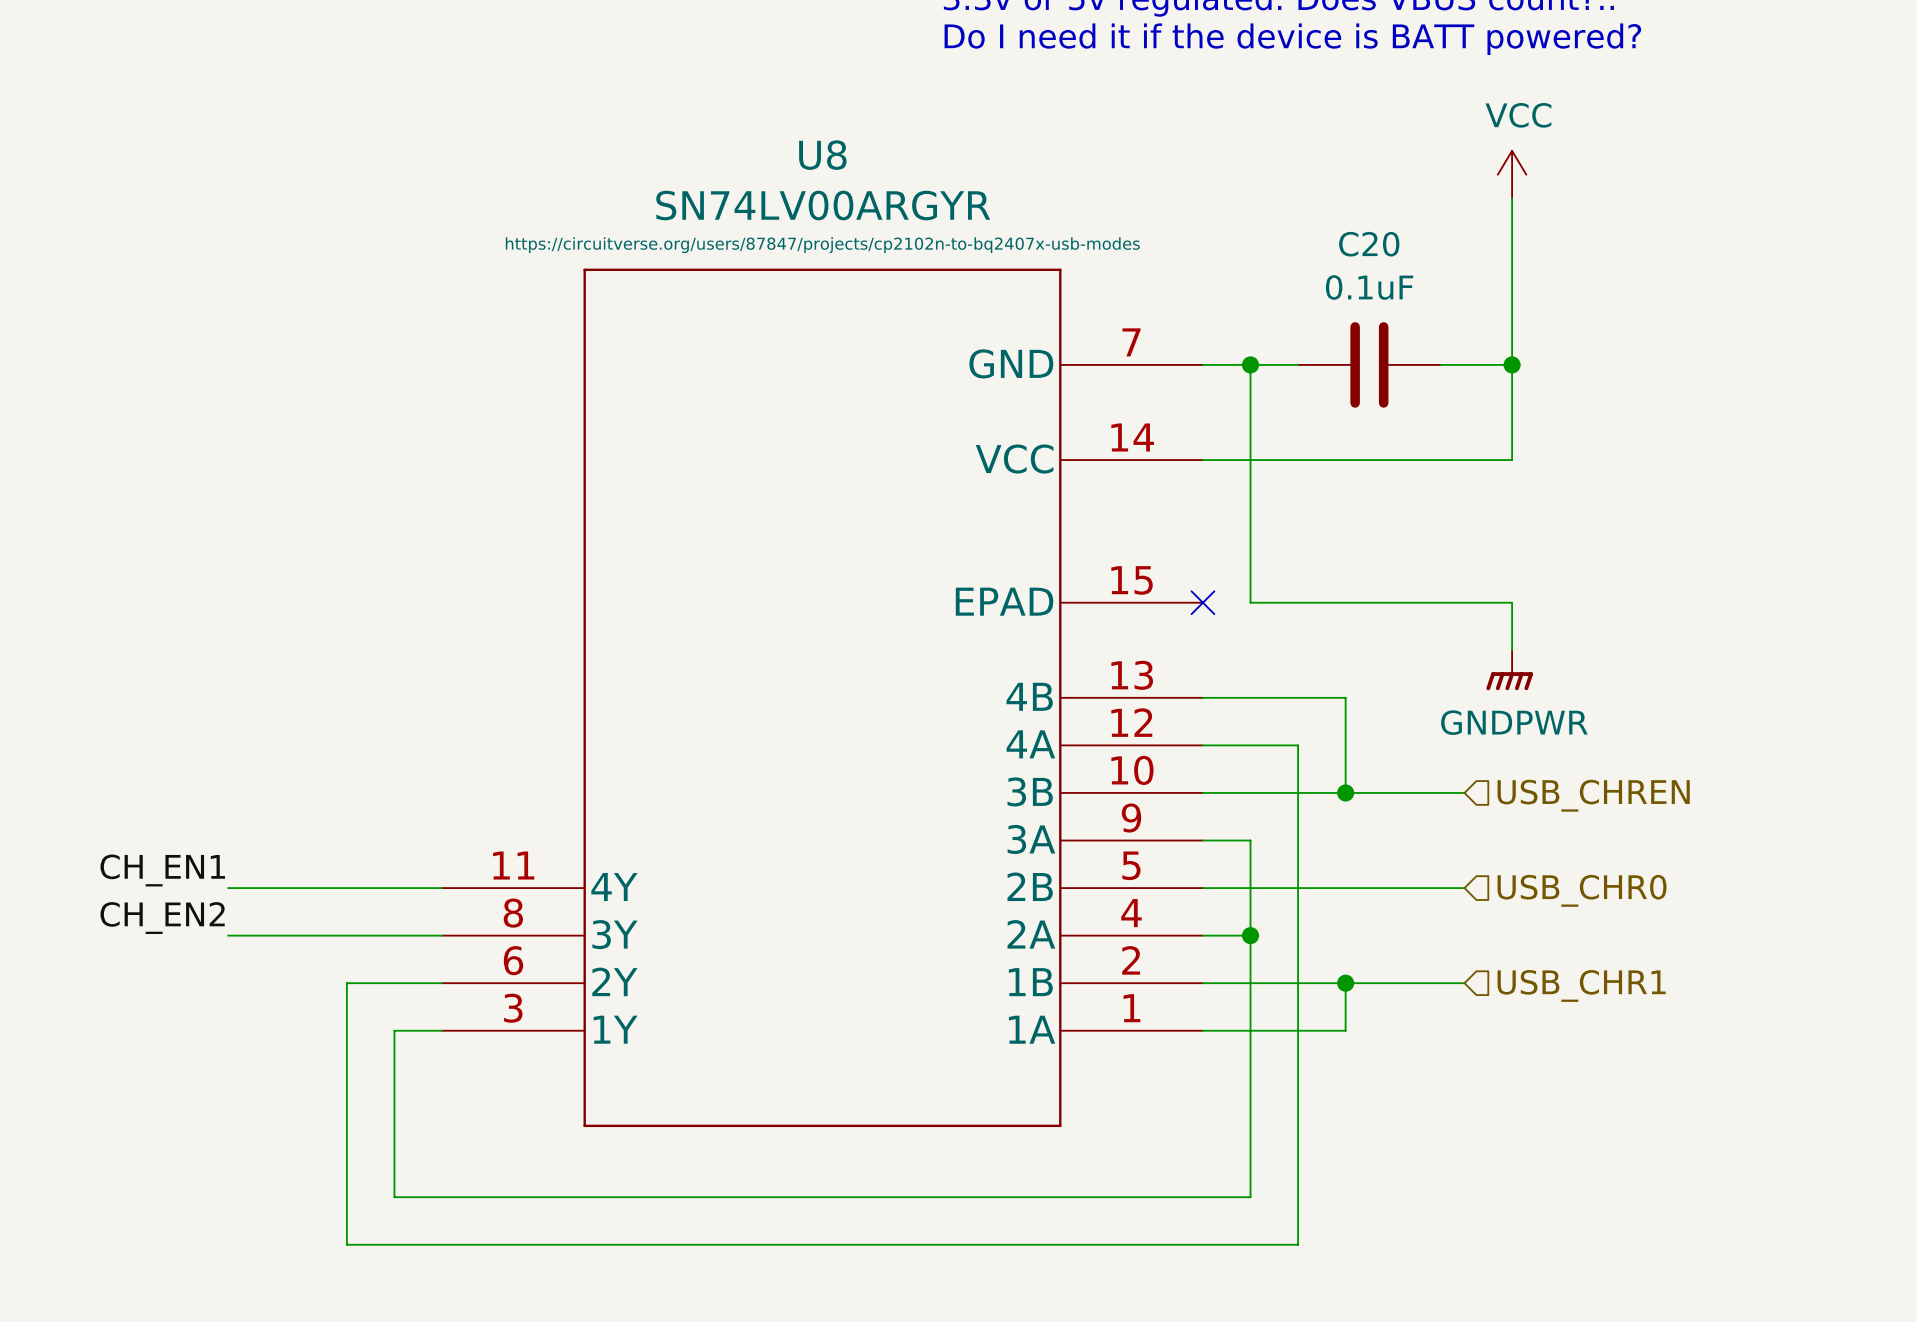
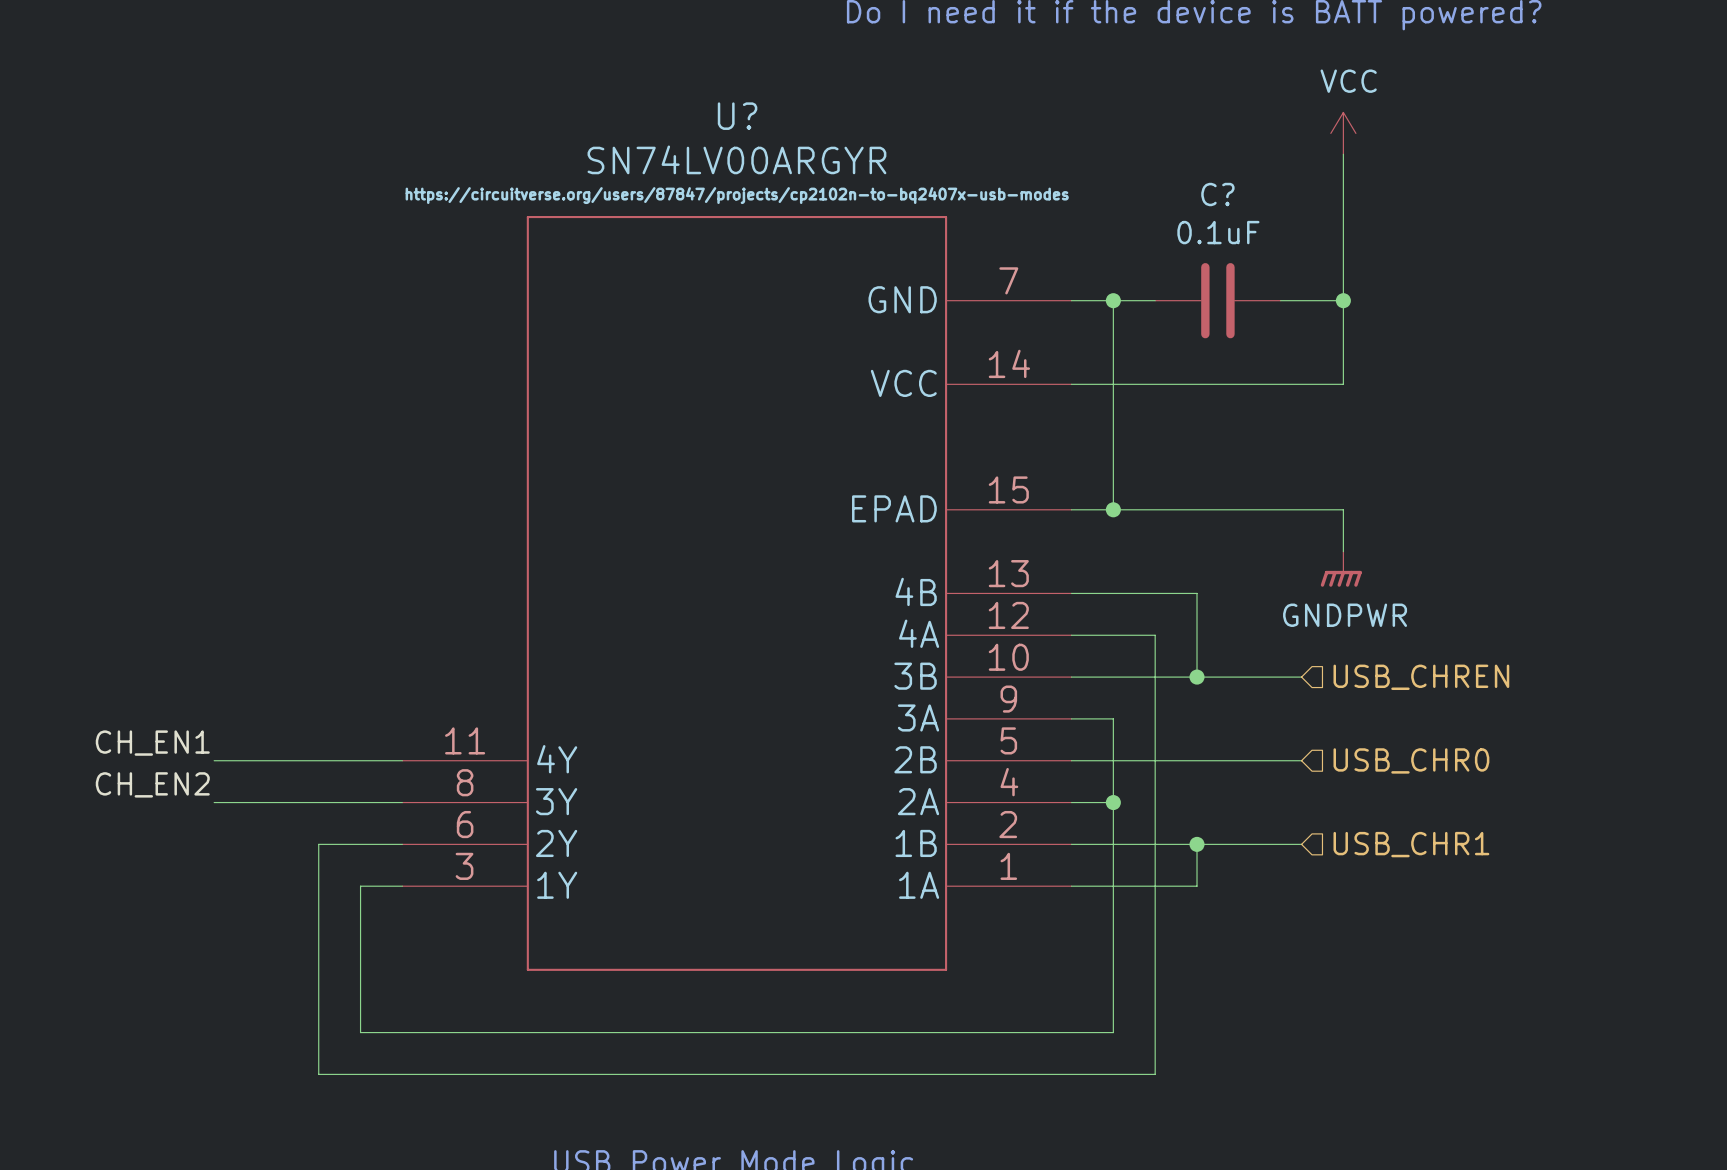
U8 name: U8 (822, 155) -> U? (737, 116)
C20 name: C20 (1369, 244) -> C? (1217, 194)
wire: none -> (1071, 509) (1113, 509)
no-connect mark: (1202, 602) -> none
junction: none -> (1113, 509)

